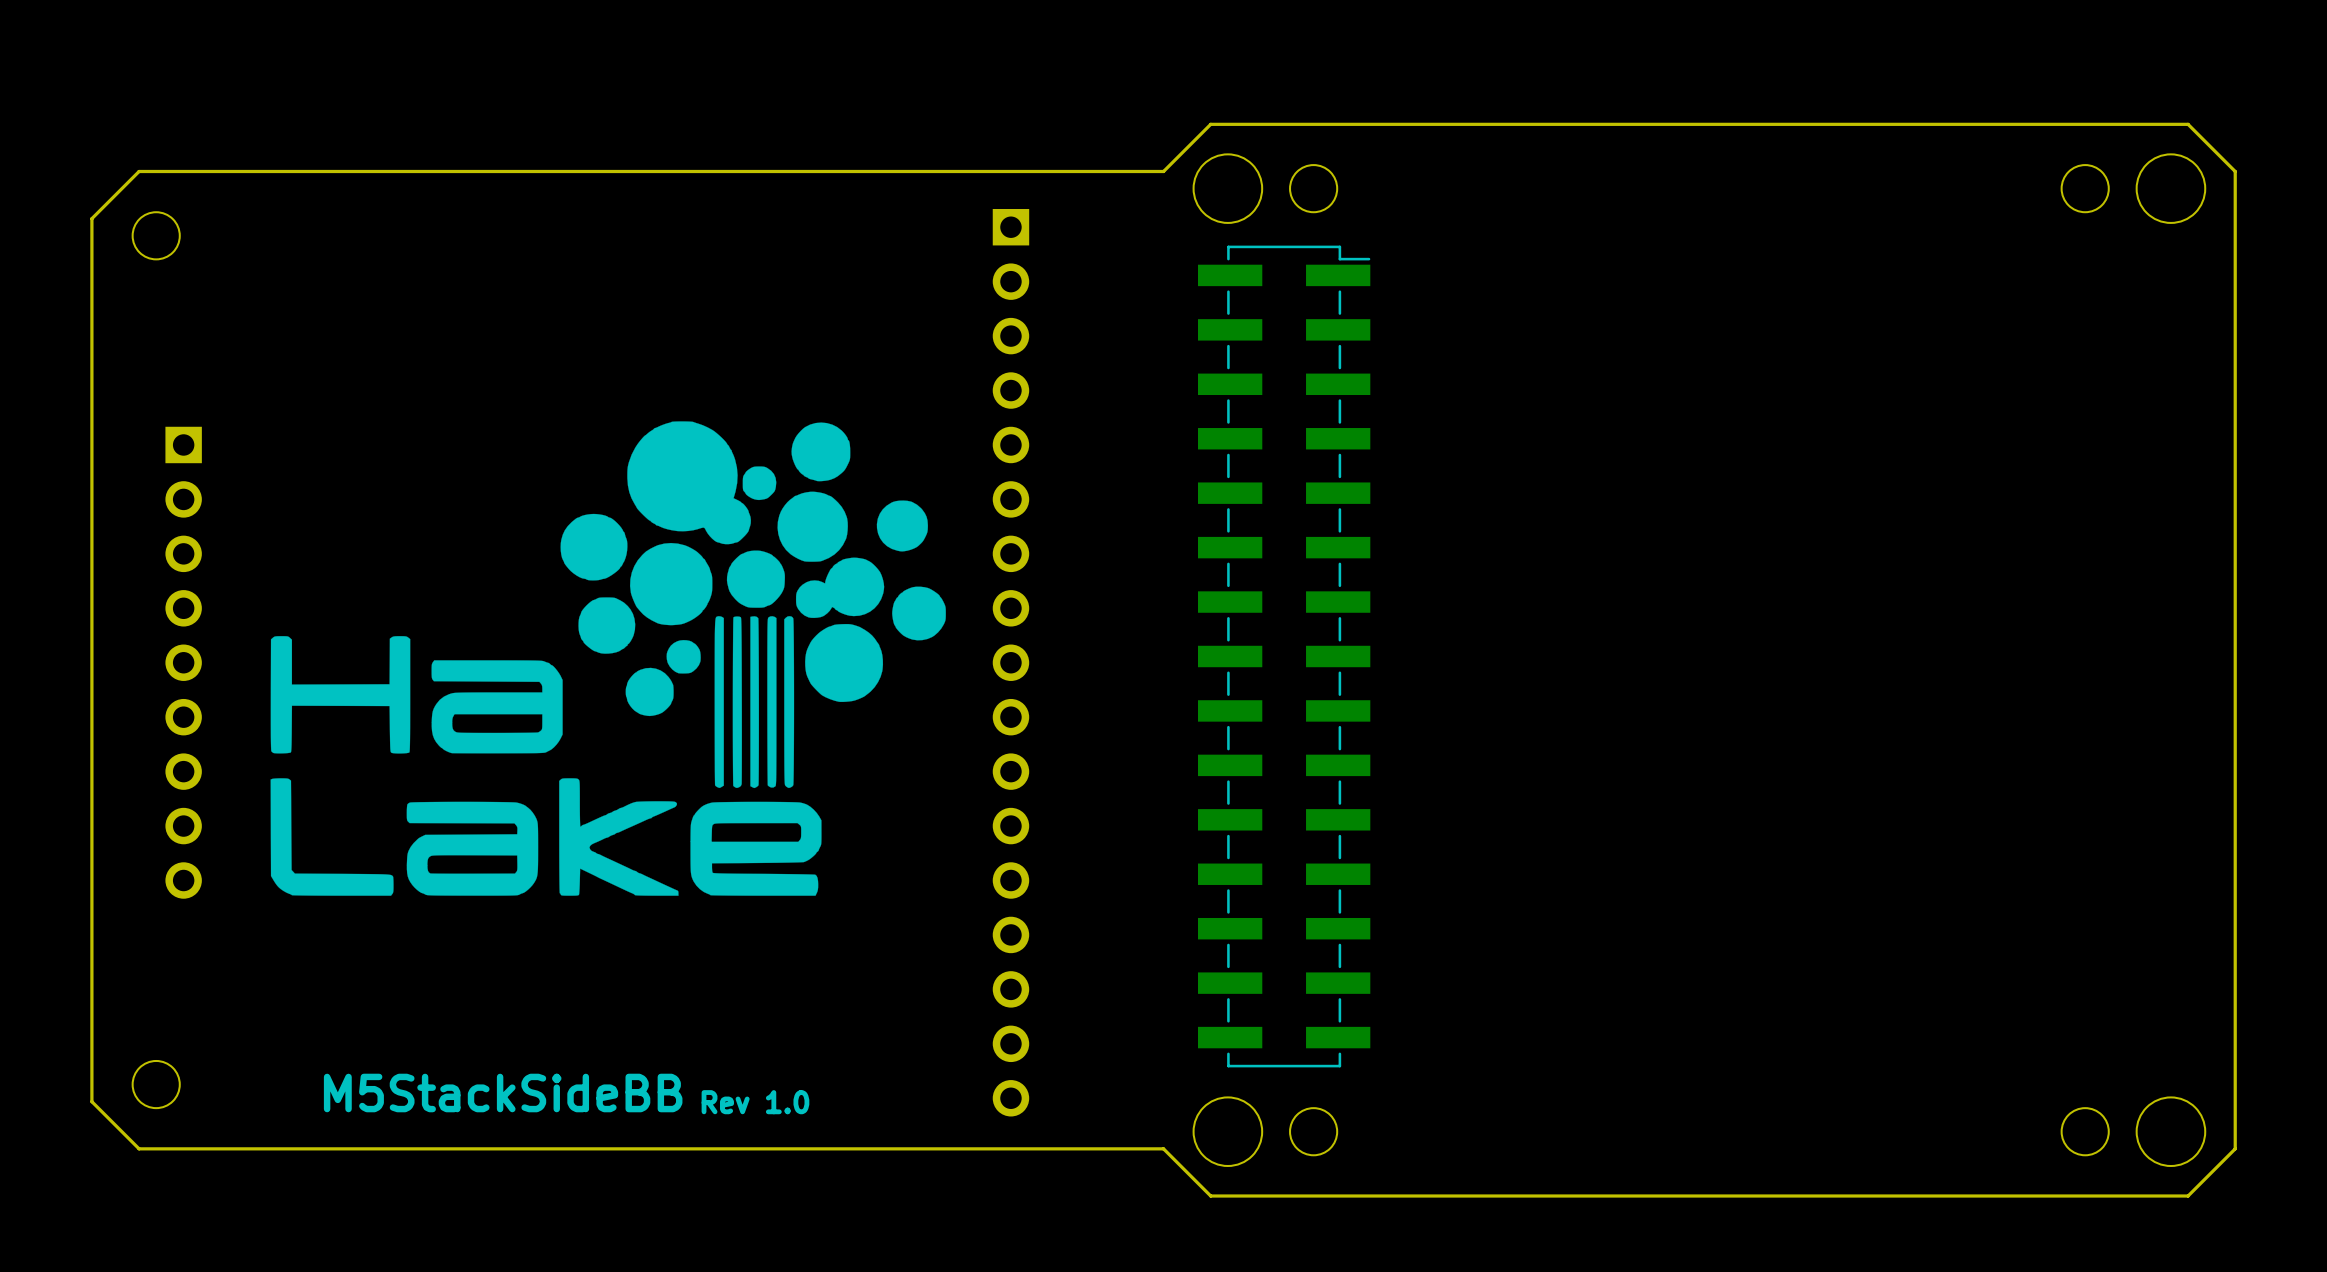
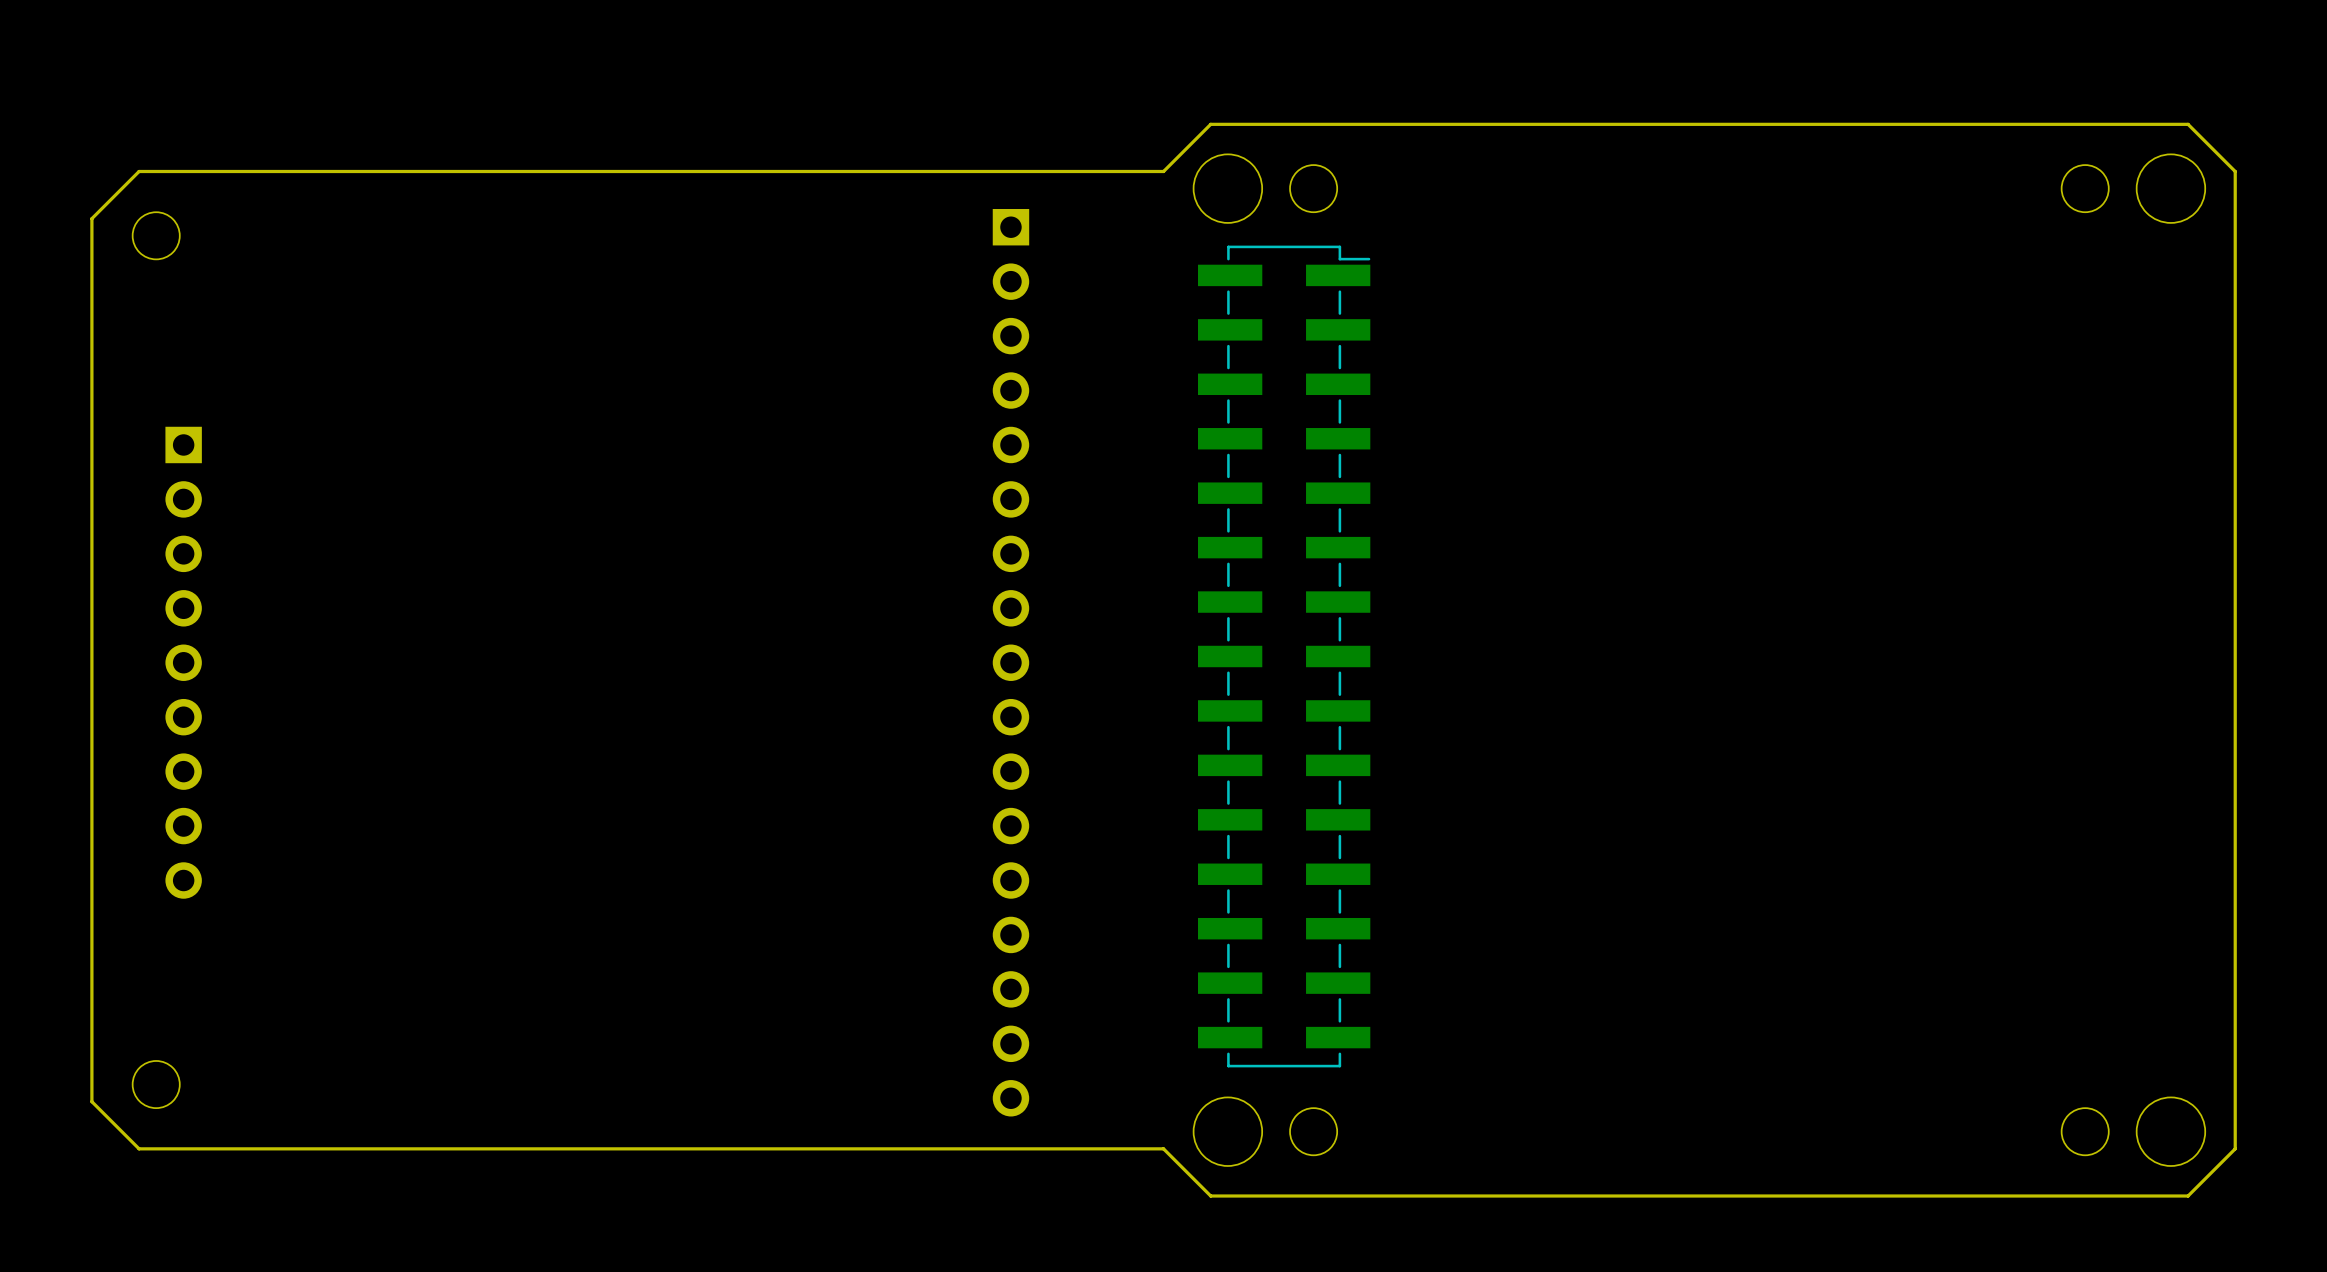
drawing: [270, 421, 946, 896] -> none
text: M5StackSideBB (503, 1092) -> none
text: Rev 1.0 (755, 1102) -> none

